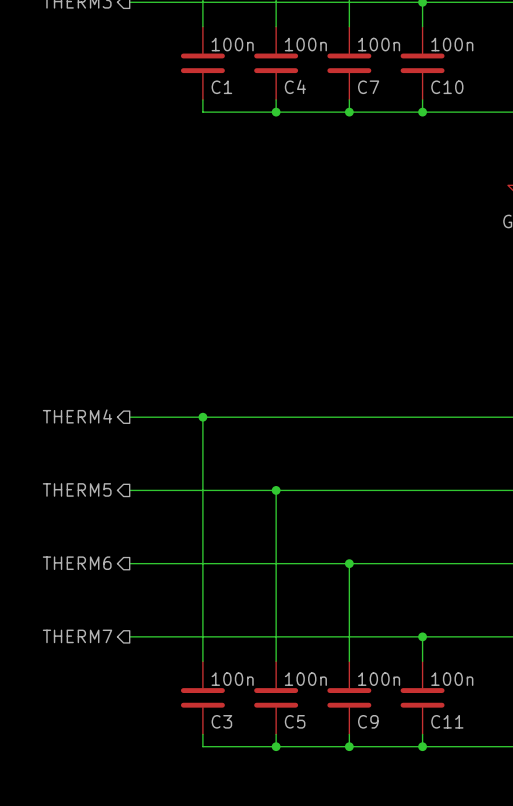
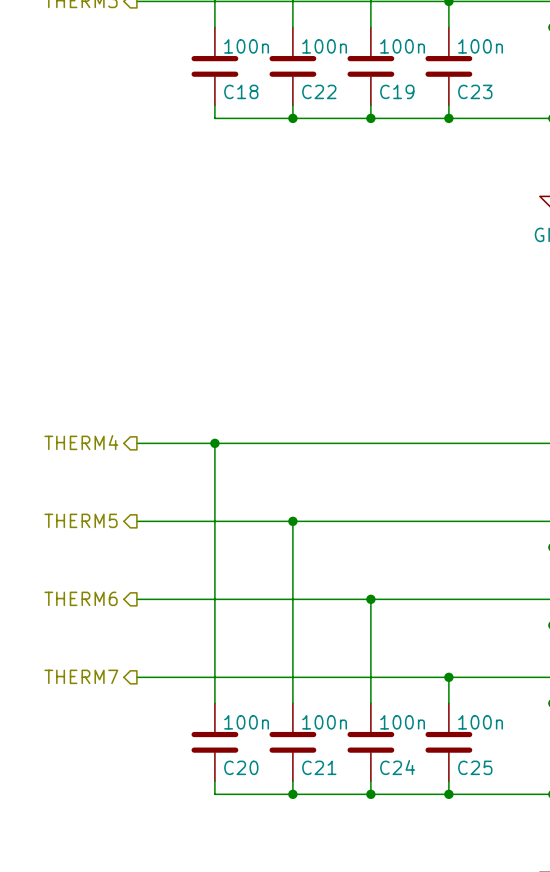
C4 name: C4 (295, 86) -> C22 (319, 91)
C1 name: C1 (221, 87) -> C18 (241, 91)
C7 name: C7 (368, 87) -> C19 (397, 91)
C10 name: C10 (447, 87) -> C23 (475, 91)
C3 name: C3 (221, 721) -> C20 (241, 767)
C5 name: C5 (295, 721) -> C21 (319, 767)
C9 name: C9 (368, 721) -> C24 (397, 767)
C11 name: C11 (447, 721) -> C25 (475, 767)

